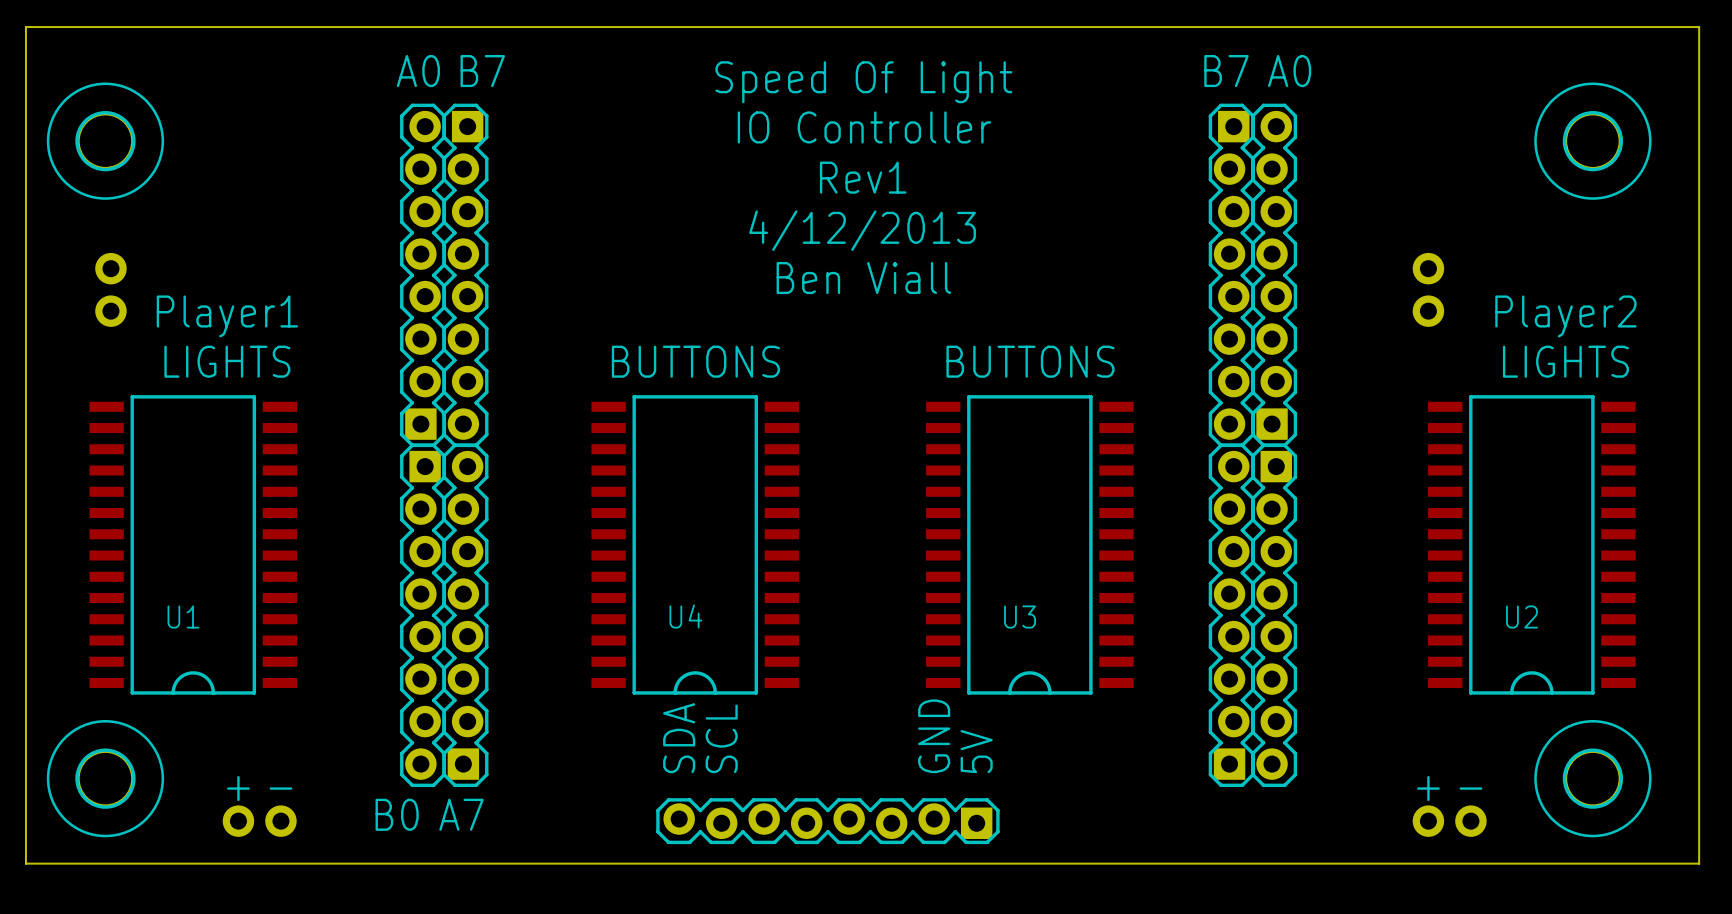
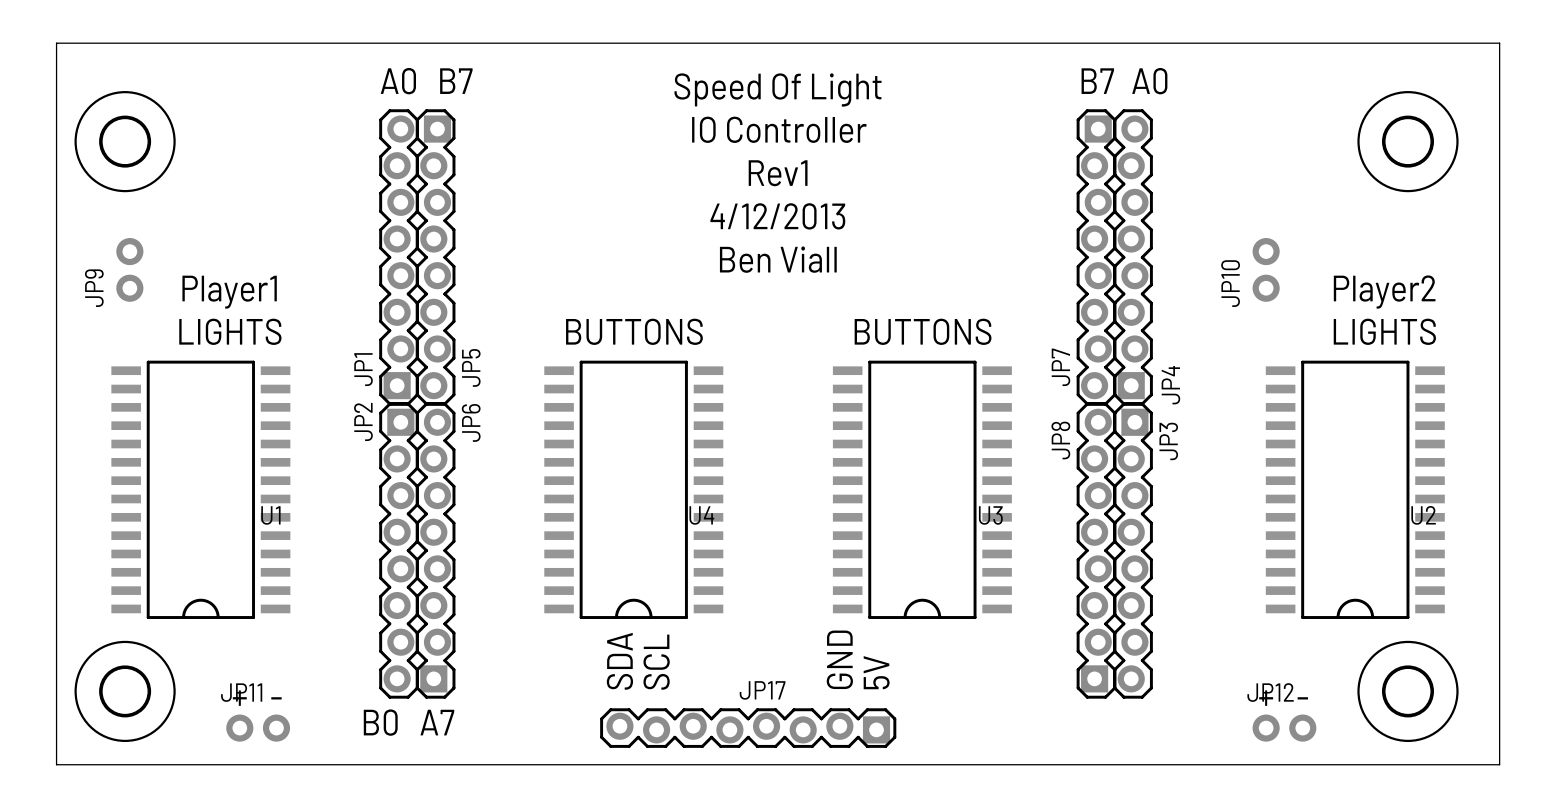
JP10 name: none -> JP10 (1230, 283)
JP9 name: none -> JP9 (94, 288)
JP1 name: none -> JP1 (363, 369)
JP7 name: none -> JP7 (1060, 367)
JP5 name: none -> JP5 (471, 367)
JP4 name: none -> JP4 (1170, 385)
JP2 name: none -> JP2 (363, 421)
JP6 name: none -> JP6 (471, 422)
JP8 name: none -> JP8 (1060, 440)
JP3 name: none -> JP3 (1168, 441)
U4 name position: U4 (685, 616) -> U4 (701, 515)
U1 name position: U1 (183, 617) -> U1 (270, 515)
U3 name position: U3 (1020, 617) -> U3 (990, 515)
U2 name position: U2 (1521, 617) -> U2 (1423, 515)
JP17 name: none -> JP17 (762, 690)
JP11 name: none -> JP11 (241, 692)
JP12 name: none -> JP12 (1270, 692)

